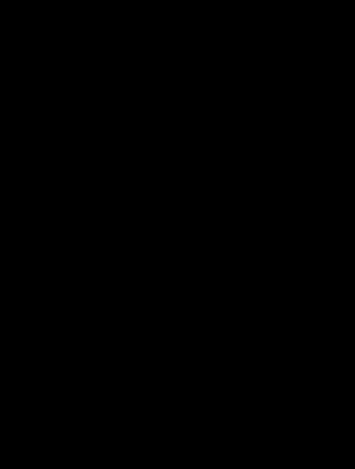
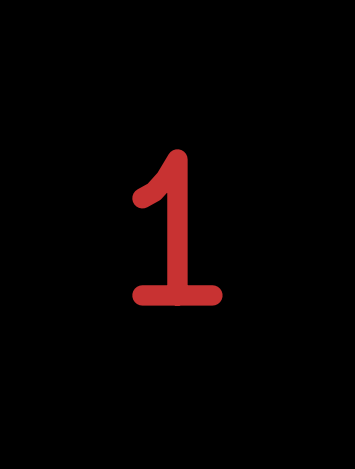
text: none -> 1 (177, 227)

